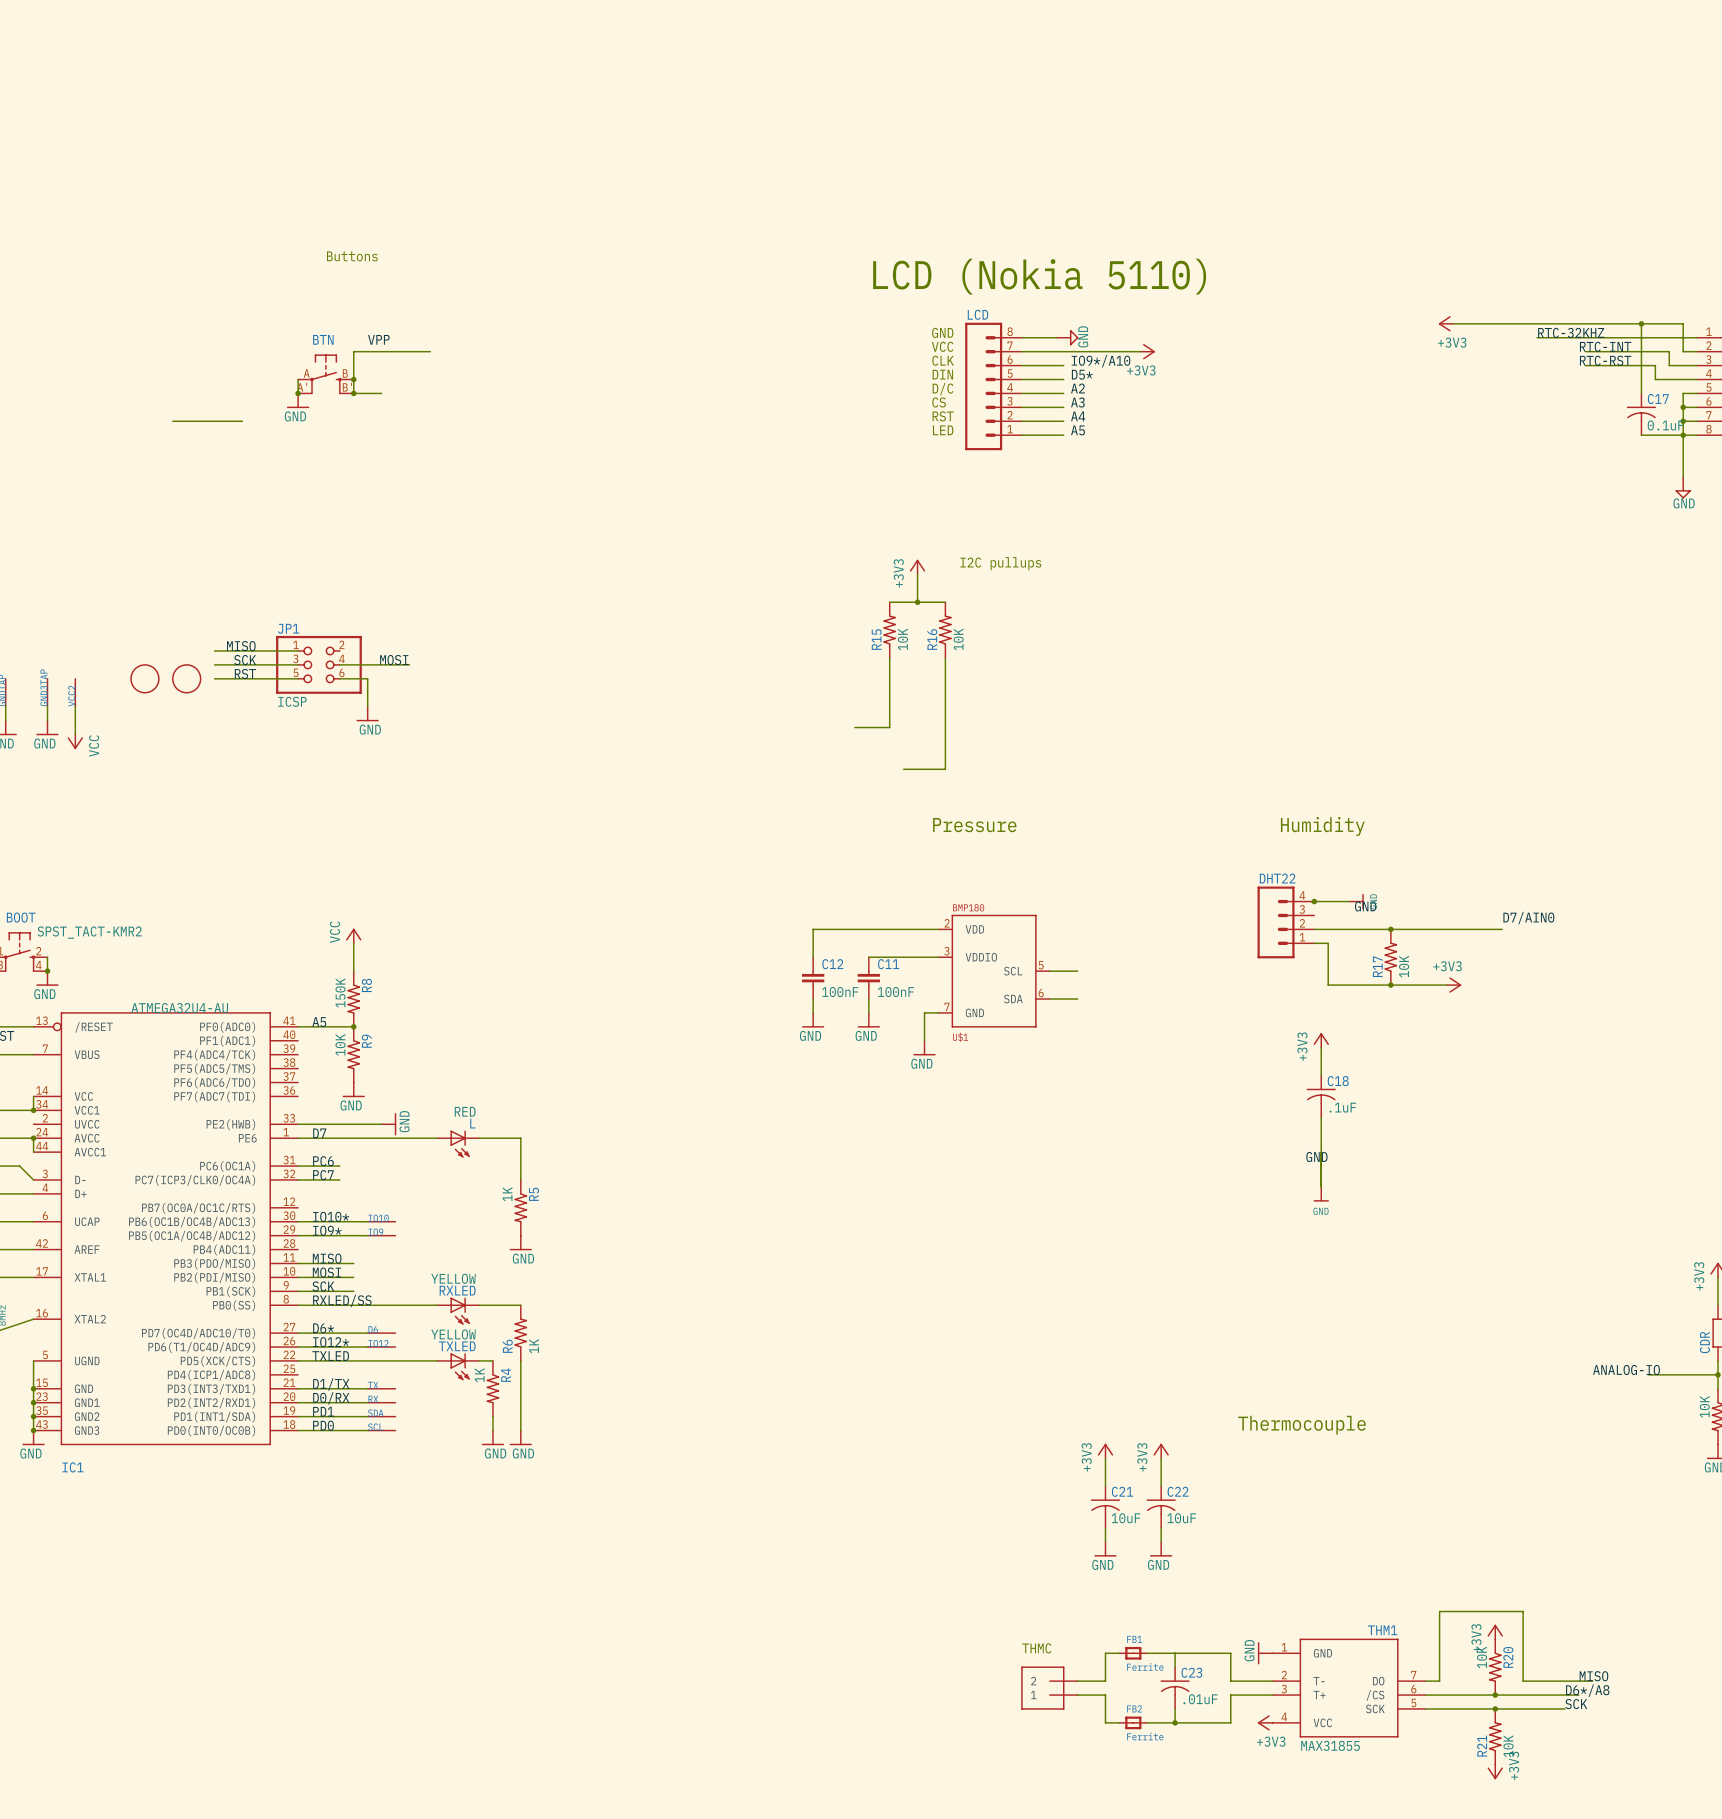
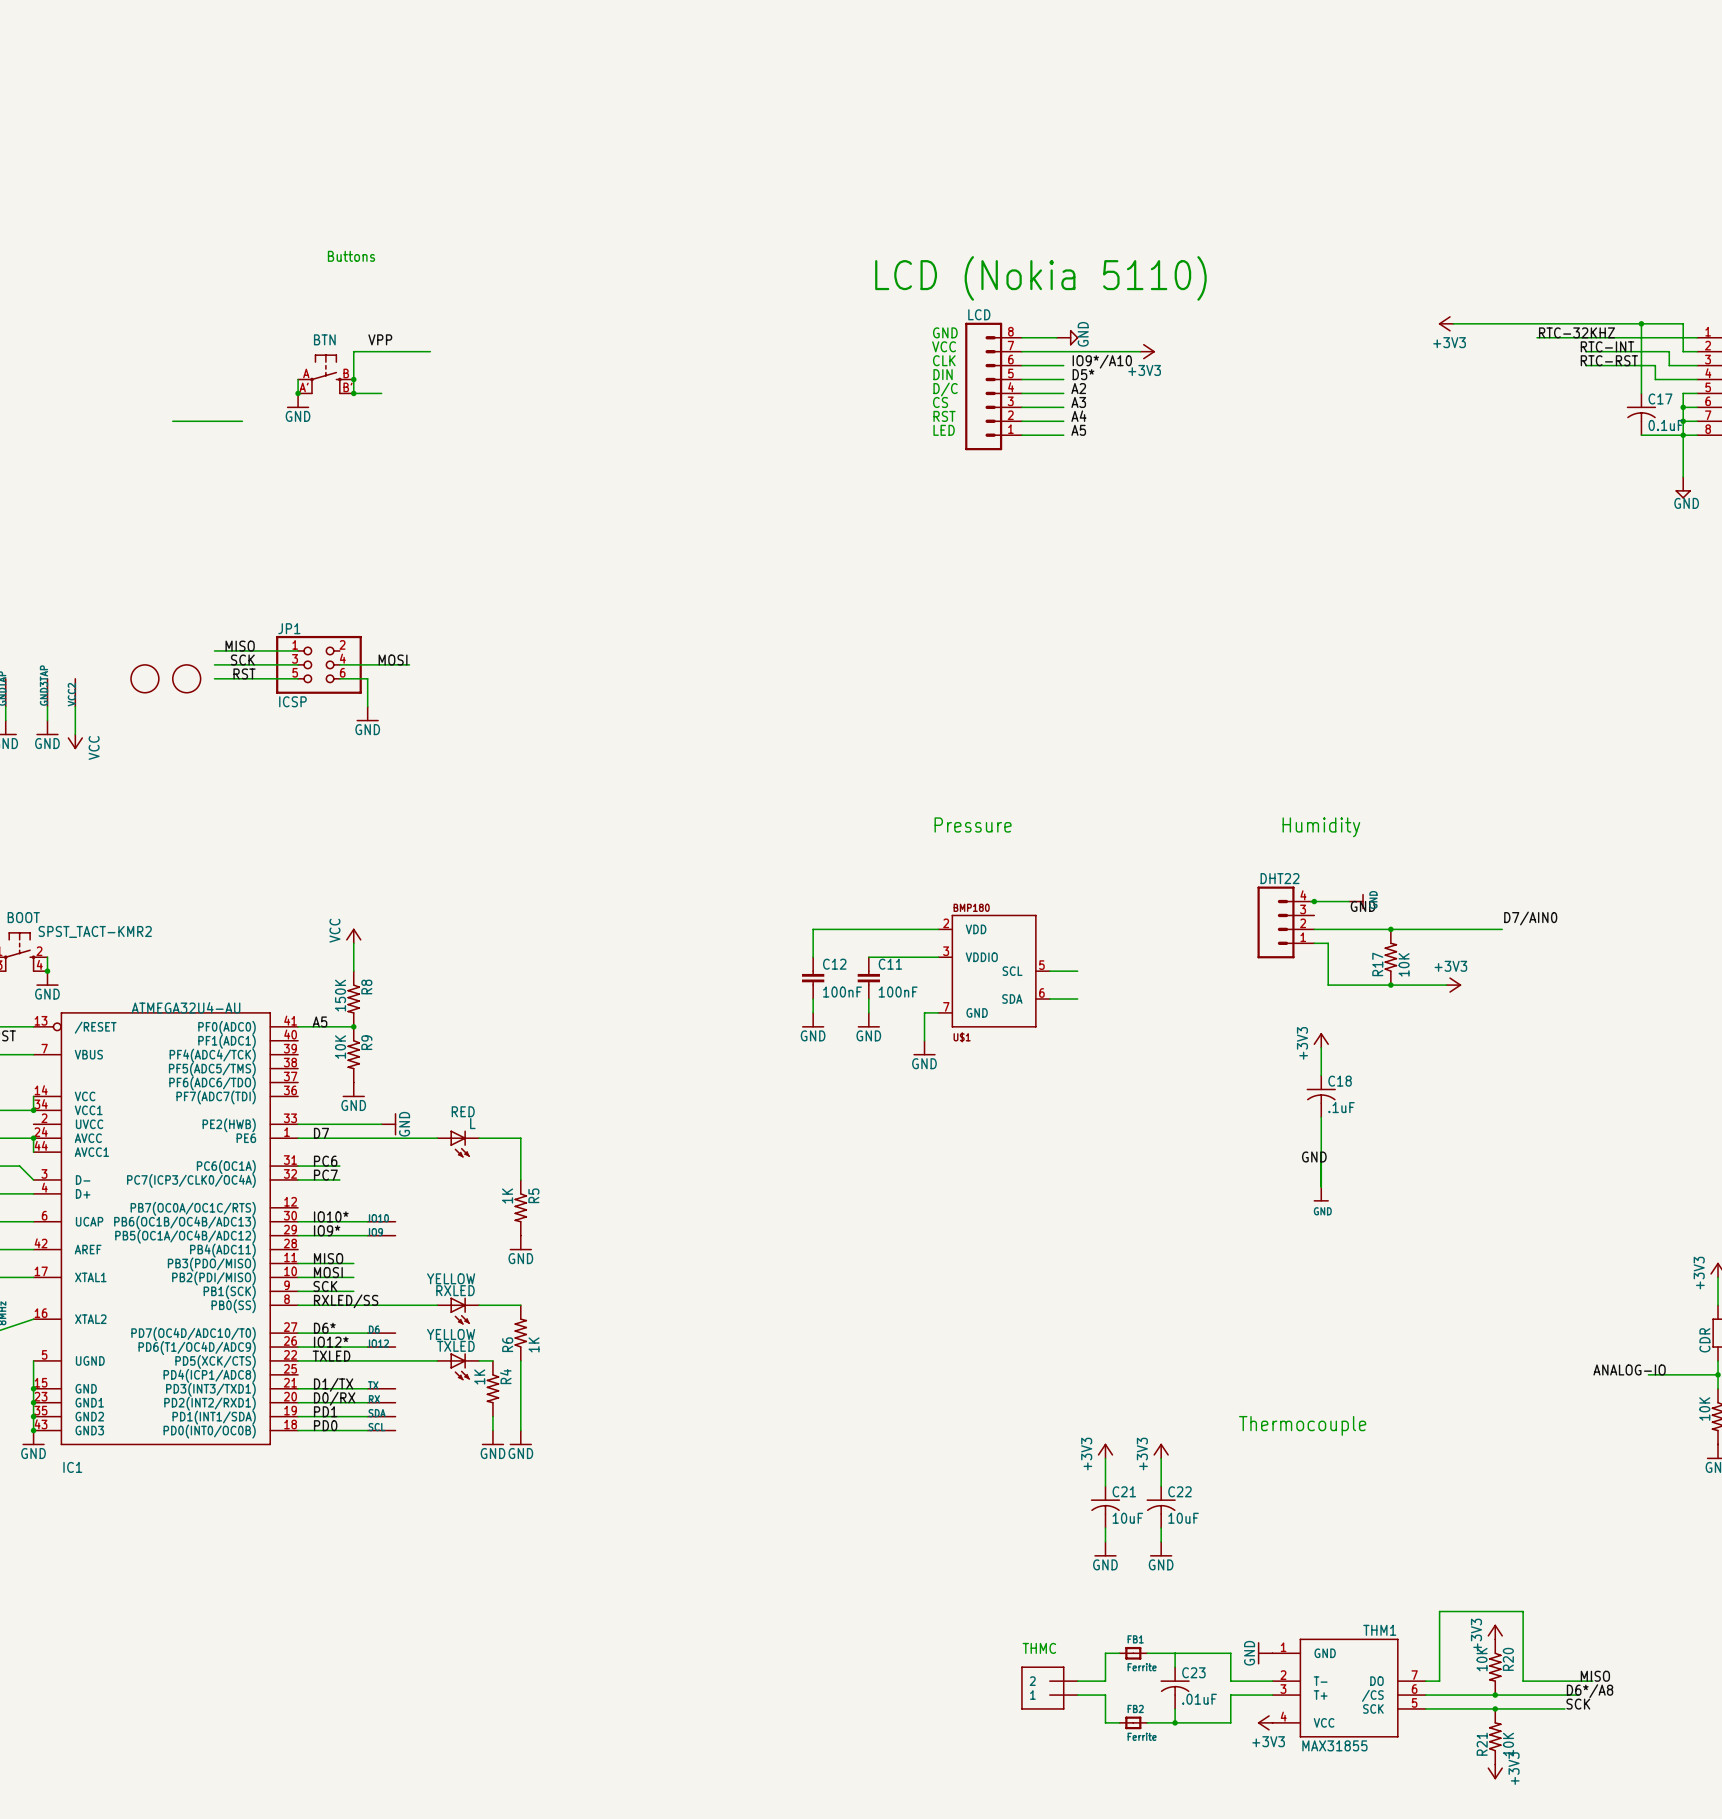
text: I2C pullups (1000, 563) -> none
power symbol: +3V3 (917, 567) -> none
wire: (917, 574) (917, 602) -> none
wire: (889, 602) (945, 602) -> none
junction: (917, 602) -> none
R15: 10K (889, 630) -> none
R16: 10K (945, 630) -> none
wire: (889, 657) (889, 727) (854, 727) -> none
wire: (945, 657) (945, 769) (903, 769) -> none

